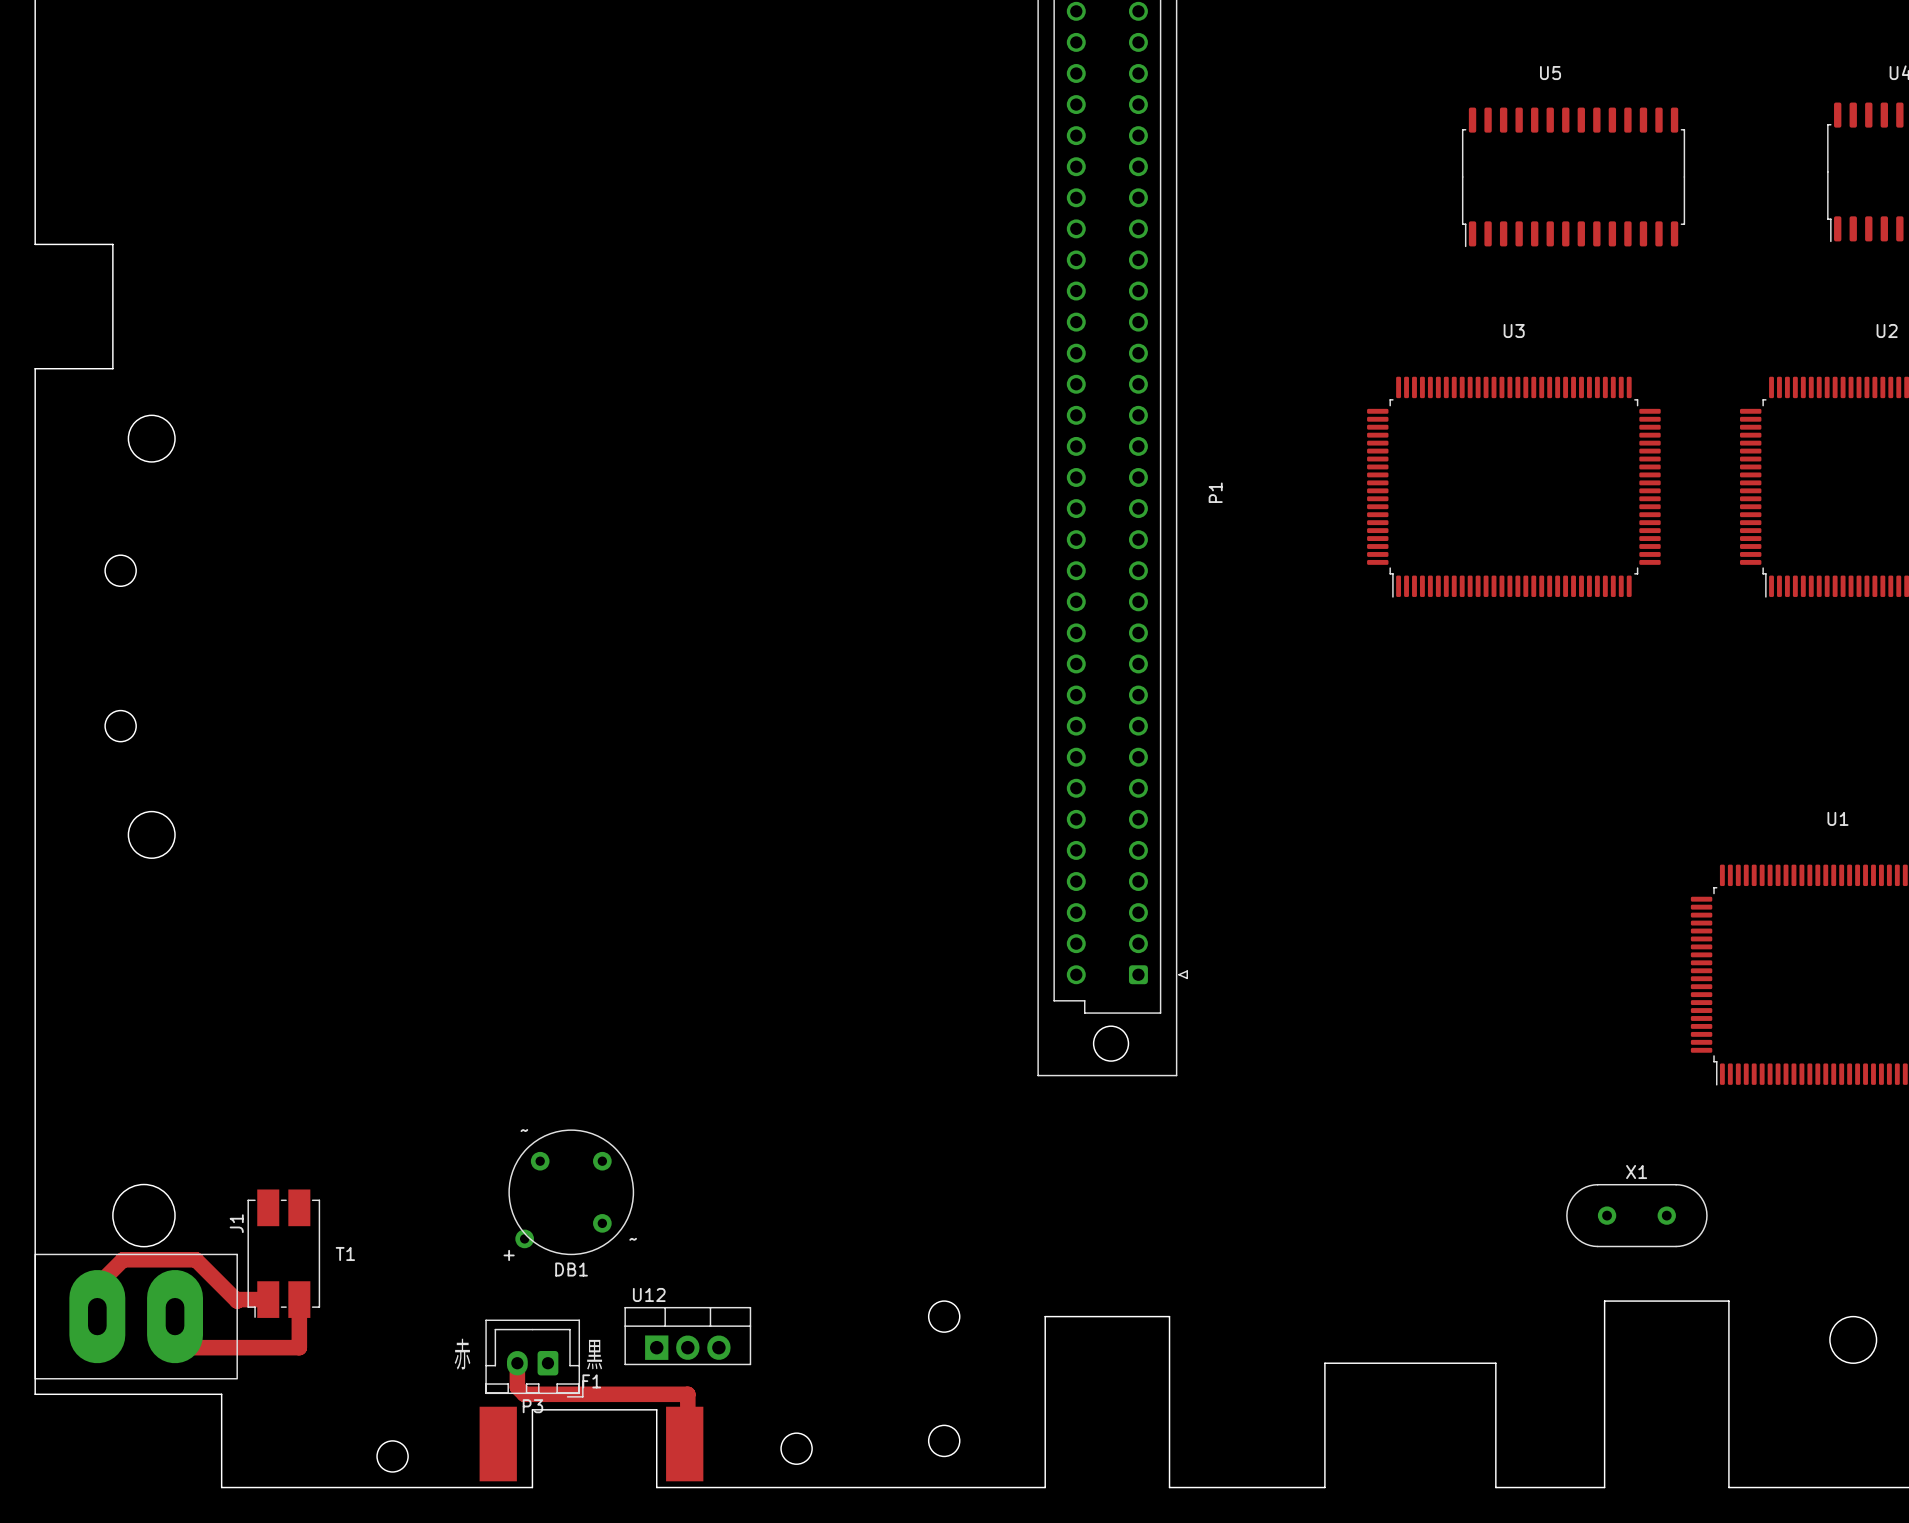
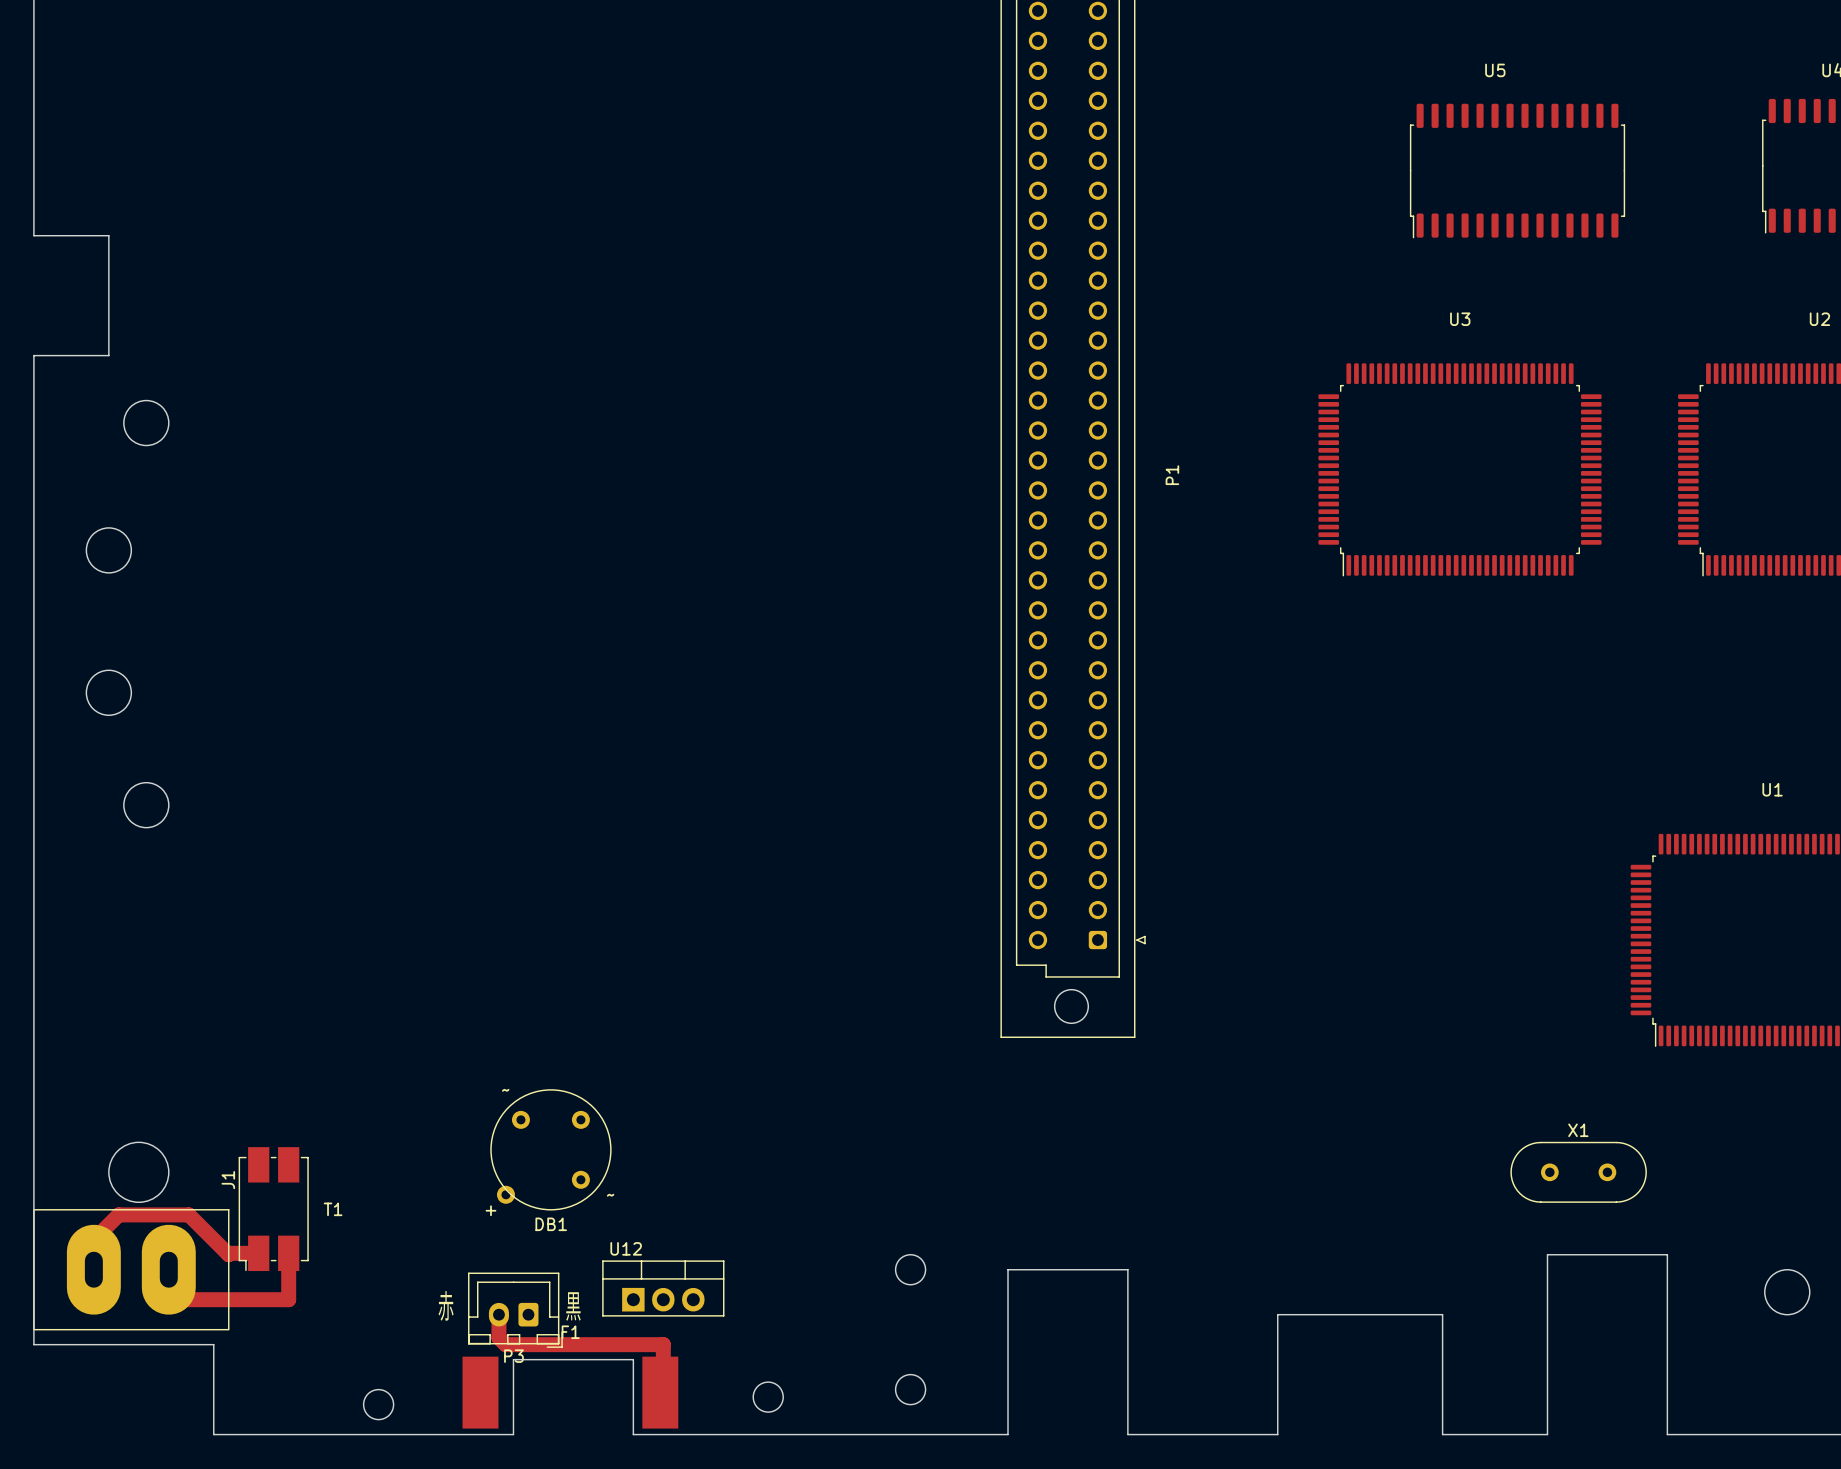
round board edge size: [104, 554, 137, 587] -> [85, 527, 132, 574]
round board edge size: [104, 709, 137, 743] -> [85, 669, 132, 716]

